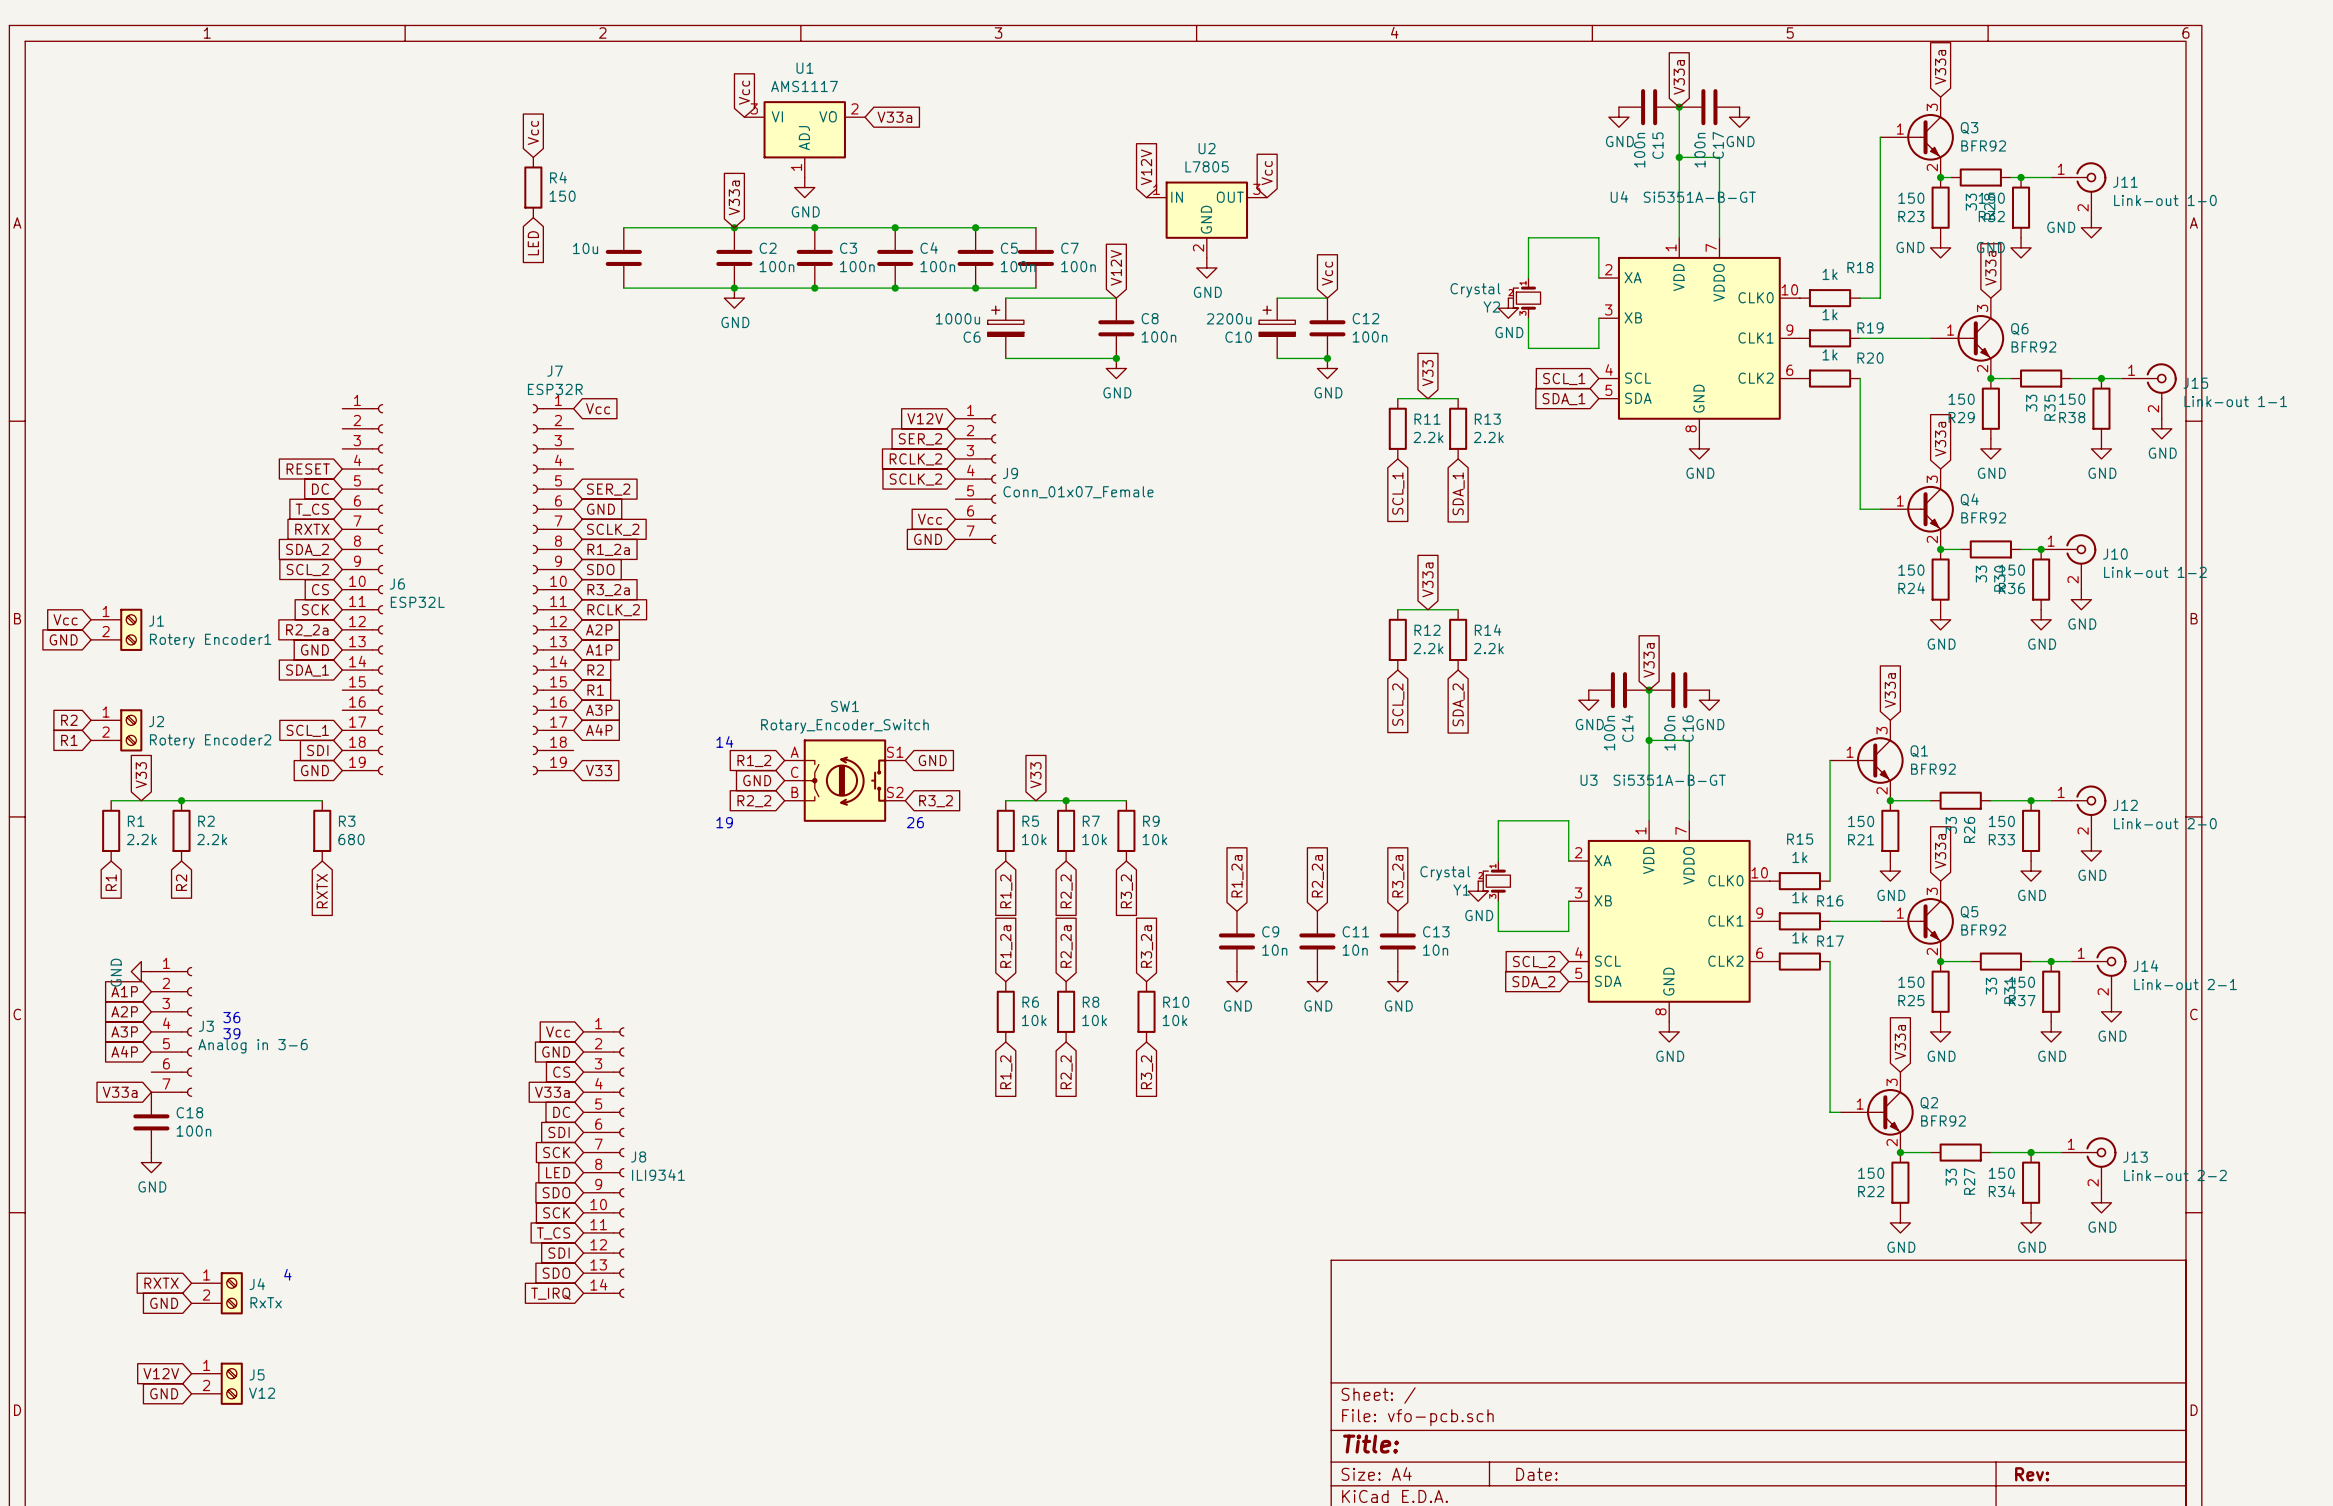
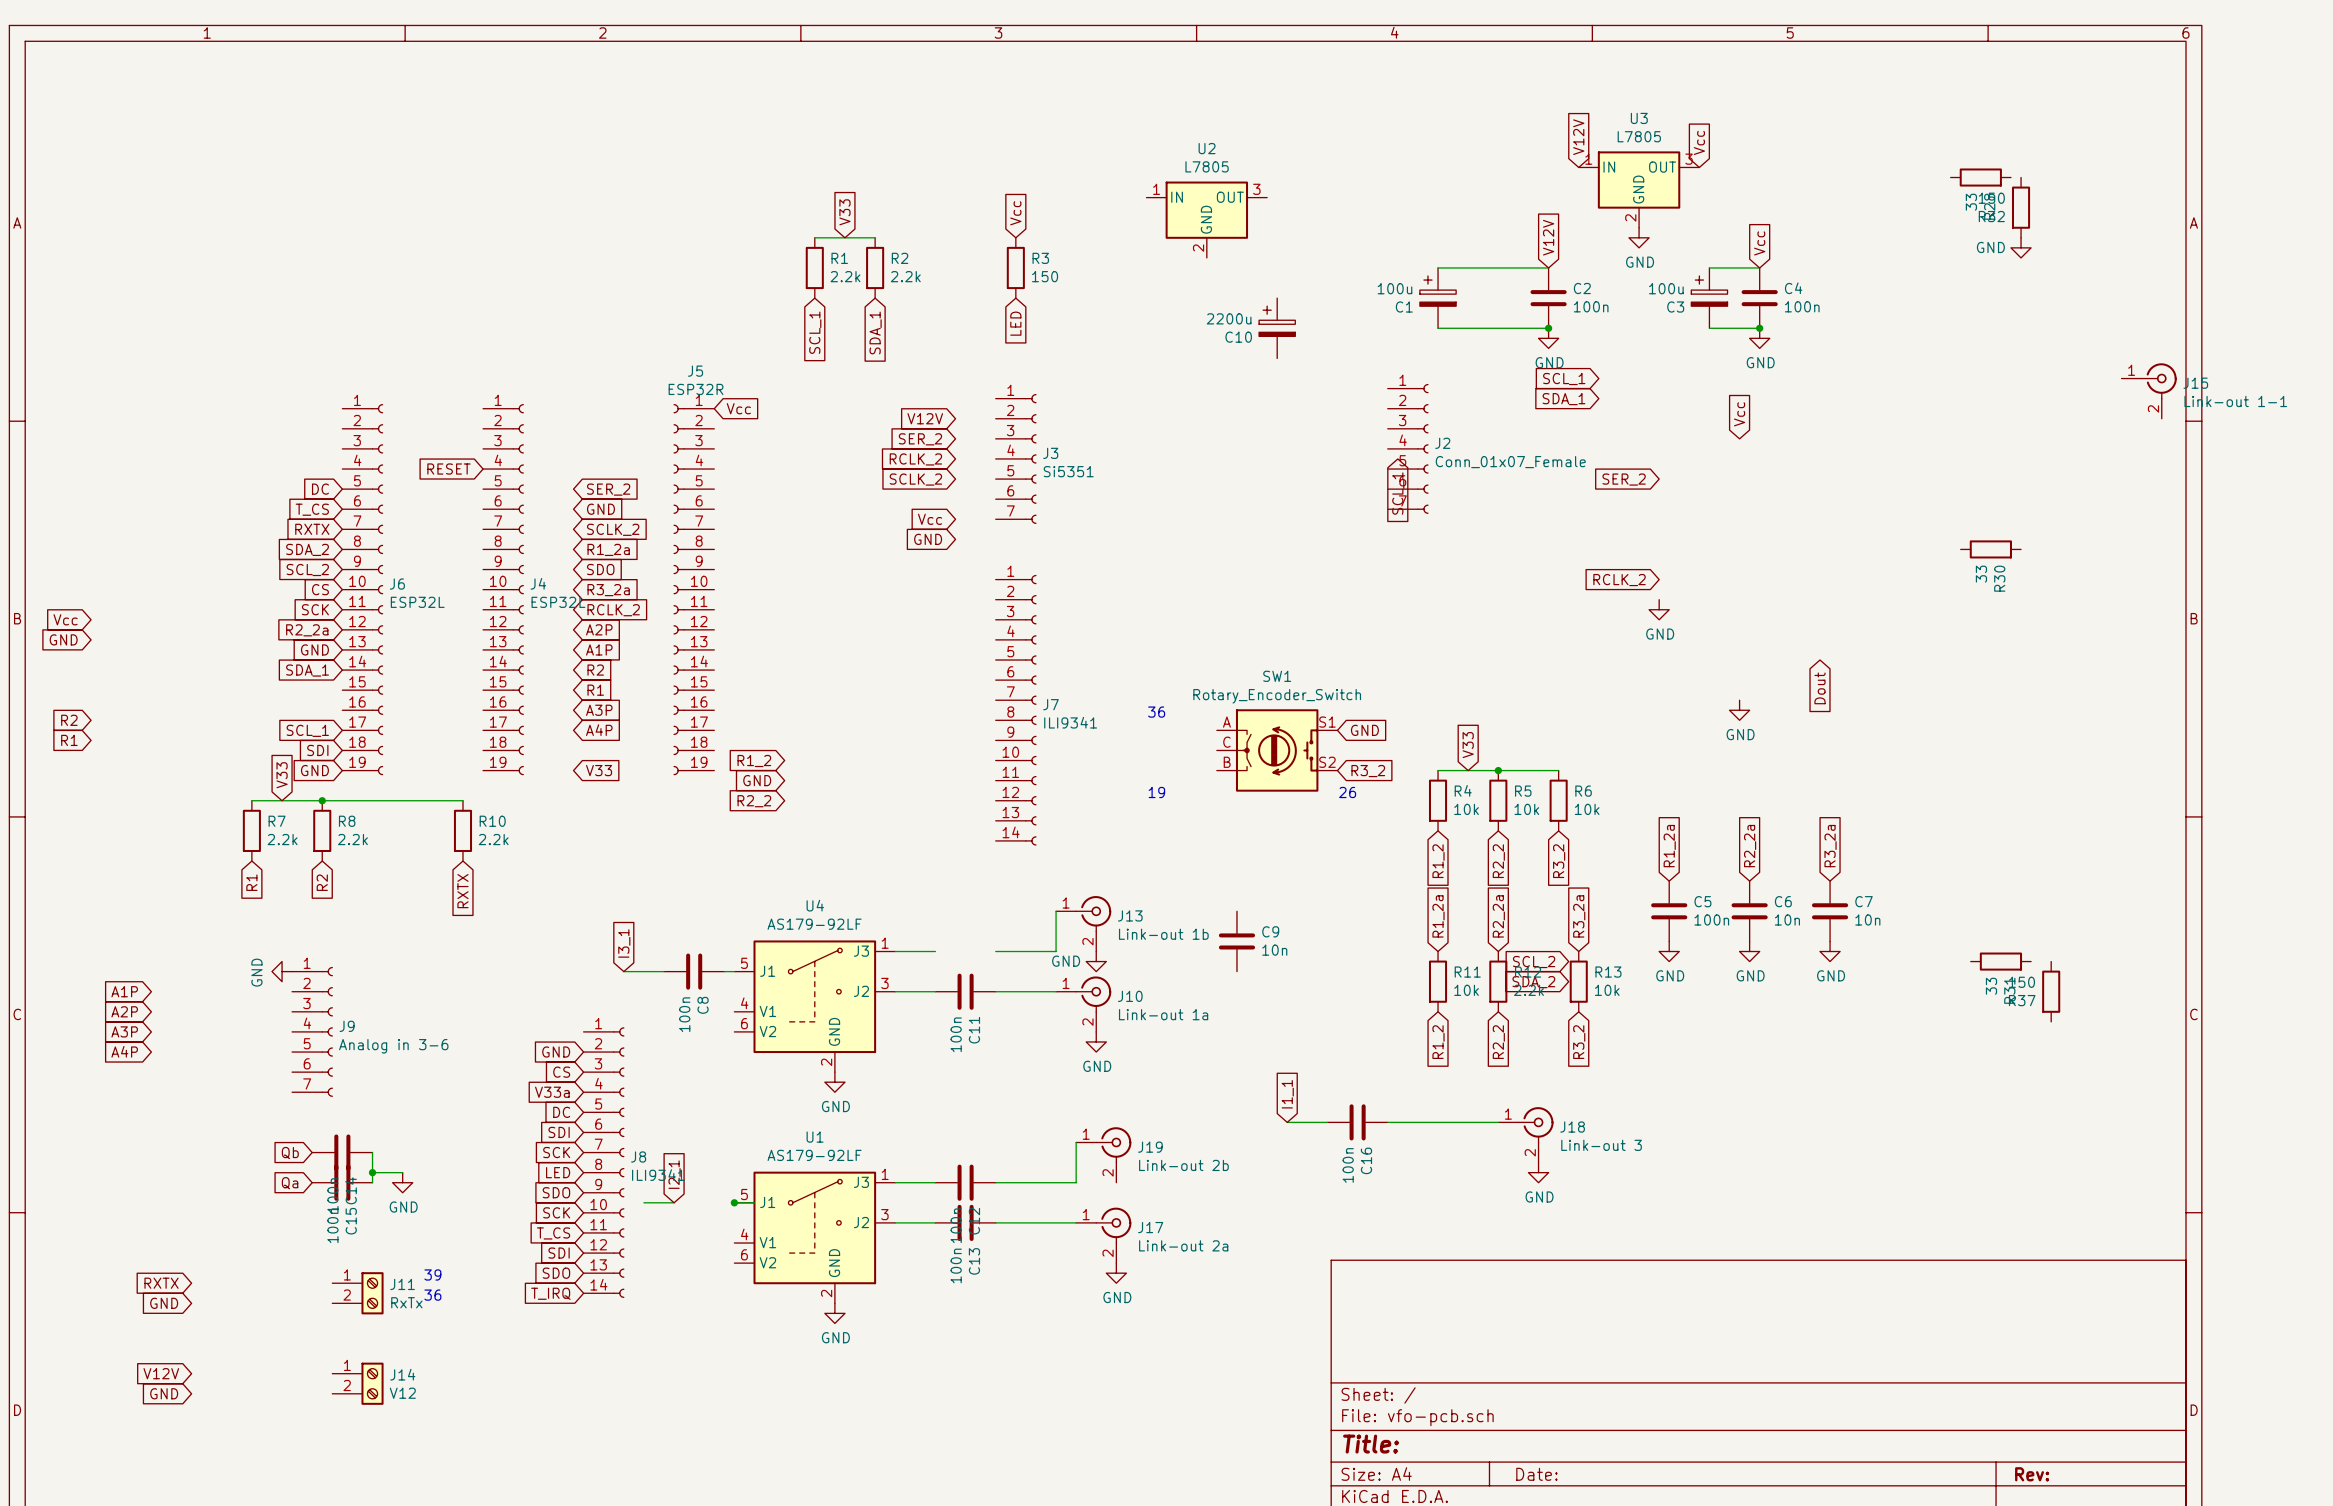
global label: V33a (1940, 67) -> none
U1 name position: U1 (804, 68) -> U1 (815, 1137)
global label: V33a (1679, 77) -> none
U1 value: AMS1117 (804, 86) -> AS179-92LF (814, 1155)
global label: Vcc (744, 92) -> none
U1 symbol: [744, 101, 866, 178] -> [734, 1171, 896, 1304]
C15 position: (1649, 107) -> (342, 1182)
wire: (1679, 107) (1679, 237) -> none
junction: (1679, 107) -> none
C17: 100n (1709, 107) -> none
global label: V33a (894, 117) -> none
power symbol: GND (1618, 117) -> none
power symbol: GND (1739, 117) -> none
global label: Vcc (533, 132) -> none
global label: none -> V12V (1578, 137)
wire: (1880, 137) (1880, 298) (1860, 298) -> none
Q3: BFR92 (1917, 137) -> none
global label: none -> Vcc (1699, 142)
wire: (1679, 157) (1719, 157) (1719, 237) -> none
junction: (1679, 157) -> none
J11 symbol: [2051, 162, 2107, 218] -> [332, 1272, 384, 1315]
global label: V12V (1146, 167) -> none
global label: Vcc (1267, 173) -> none
wire: (1940, 177) (1950, 177) -> none
junction: (1940, 177) -> none
wire: (2010, 177) (2051, 177) -> none
junction: (2021, 177) -> none
R4 position: (533, 187) -> (1438, 800)
power symbol: GND (804, 187) -> none
R4 value: 150 (562, 196) -> 10k (1466, 809)
global label: V33a (734, 197) -> none
U4 name position: U4 (1619, 197) -> U4 (815, 905)
U4 value: Si5351A-B-GT (1699, 197) -> AS179-92LF (814, 924)
J11 value: Link-out 1-0 (2165, 200) -> RxTx (406, 1302)
R23: 150 (1940, 207) -> none
global label: none -> V33 (844, 212)
global label: none -> Vcc (1015, 213)
wire: (623, 227) (1035, 227) -> none
junction: (734, 227) -> none
C3 symbol: [796, 227, 833, 289] -> [1691, 267, 1728, 329]
junction: (814, 227) -> none
junction: (895, 227) -> none
junction: (975, 227) -> none
power symbol: GND (2091, 227) -> none
wire: none -> (814, 237) (875, 237)
global label: none -> V12V (1548, 237)
U4 symbol: [1598, 237, 1800, 439] -> [734, 940, 896, 1073]
power symbol: none -> GND (1639, 237)
global label: LED (533, 243) -> none
global label: none -> Vcc (1759, 243)
power symbol: GND (1940, 247) -> none
C3 name position: C3 (848, 248) -> C3 (1675, 307)
part: 10u (623, 257) -> none
C2 position: (734, 257) -> (1548, 298)
C4 position: (895, 257) -> (1759, 298)
C5 position: (975, 257) -> (1669, 911)
C7 position: (1035, 257) -> (1830, 911)
C3 value: 100n (857, 266) -> 100u (1666, 288)
C7 value: 100n (1078, 266) -> 10n (1867, 919)
R3: none -> 150 (1015, 267)
global label: V12V (1116, 267) -> none
power symbol: GND (1206, 267) -> none
wire: none -> (1438, 267) (1548, 267)
global label: V33a (1990, 268) -> none
global label: Vcc (1327, 273) -> none
wire: (1528, 278) (1528, 237) (1598, 237) (1598, 278) -> none
wire: (623, 288) (1035, 288) -> none
junction: (734, 288) -> none
junction: (814, 288) -> none
junction: (895, 288) -> none
junction: (975, 288) -> none
power symbol: GND (734, 298) -> none
C6 symbol: [987, 298, 1024, 359] -> [1731, 881, 1768, 942]
wire: (1005, 298) (1116, 298) -> none
wire: (1277, 298) (1327, 298) -> none
C1: none -> 100u (1438, 298)
Y2: Crystal (1524, 298) -> none
R18: 1k (1830, 298) -> none
power symbol position: GND (1508, 308) -> GND (1548, 338)
C6 value: 1000u (957, 318) -> 10n (1787, 919)
wire: (1528, 318) (1528, 348) (1598, 348) (1598, 318) -> none
global label: none -> LED (1015, 323)
C8 rotation: 0° (1116, 328) -> 90° clockwise (694, 971)
C8 position: (1116, 328) -> (694, 971)
C12 rotation: 0° (1327, 328) -> 90° clockwise (965, 1182)
C12 position: (1327, 328) -> (965, 1182)
wire: none -> (1438, 328) (1548, 328)
junction: none -> (1548, 328)
junction: none -> (1759, 328)
global label: none -> SCL_1 (815, 332)
global label: none -> SDA_1 (875, 332)
C6 name position: C6 (972, 337) -> C6 (1783, 901)
power symbol: none -> GND (1759, 338)
R19: 1k (1830, 338) -> none
wire: (1860, 338) (1930, 338) -> none
Q6: BFR92 (1967, 338) -> none
wire: (1005, 358) (1116, 358) -> none
junction: (1116, 358) -> none
wire: (1277, 358) (1327, 358) -> none
junction: (1327, 358) -> none
power symbol: GND (1116, 368) -> none
power symbol: GND (1327, 368) -> none
J7 name position: J7 (555, 371) -> J7 (1050, 704)
global label: V33 (1427, 373) -> none
R20: 1k (1830, 378) -> none
wire: (1860, 378) (1860, 509) (1880, 509) -> none
wire: (1990, 378) (2010, 378) -> none
junction: (1990, 378) -> none
R35: 33 (2041, 378) -> none
wire: (2071, 378) (2121, 378) -> none
junction: (2101, 378) -> none
J7 value: ESP32R (555, 389) -> ILI9341 (1070, 722)
wire: (1397, 398) (1458, 398) -> none
J7 symbol: [532, 404, 574, 776] -> [995, 574, 1037, 846]
global label position: Vcc (598, 408) -> Vcc (738, 408)
R29: 150 (1990, 408) -> none
R38: 150 (2101, 408) -> none
global label: none -> Vcc (1739, 414)
R11 position: (1397, 428) -> (1438, 981)
R13 position: (1458, 428) -> (1578, 981)
power symbol: GND (2161, 428) -> none
R11 value: 2.2k (1428, 437) -> 10k (1466, 990)
R13 value: 2.2k (1488, 437) -> 10k (1607, 990)
global label: V33a (1940, 439) -> none
power symbol: GND (1699, 448) -> none
power symbol: GND (1990, 448) -> none
power symbol: GND (2101, 448) -> none
global label position: RESET (308, 469) -> RESET (448, 469)
J9 position: (975, 479) -> (312, 1031)
global label: none -> SER_2 (1624, 479)
J9 value: Conn_01x07_Female (1078, 492) -> Analog in 3-6 (393, 1046)
global label: SDA_1 (1458, 493) -> none
Q4: BFR92 (1917, 509) -> none
wire: (1940, 549) (1960, 549) -> none
junction: (1940, 549) -> none
wire: (2021, 549) (2041, 549) -> none
junction: (2041, 549) -> none
J10 position: (2068, 561) -> (1083, 1004)
J10 value: Link-out 1-2 (2155, 572) -> Link-out 1a (1163, 1014)
global label: V33a (1427, 579) -> none
R24: 150 (1940, 579) -> none
R36: 150 (2041, 579) -> none
global label: none -> RCLK_2 (1619, 580)
power symbol: GND (2081, 599) -> none
wire: (1397, 609) (1458, 609) -> none
power symbol: none -> GND (1659, 609)
power symbol: GND (1940, 619) -> none
power symbol: GND (2041, 619) -> none
J1: Rotery Encoder1 (116, 629) -> none
R12 position: (1397, 639) -> (1498, 981)
R14: 2.2k (1458, 639) -> none
global label: V33a (1649, 660) -> none
global label: none -> Dout (1819, 688)
C14 position: (1618, 690) -> (342, 1152)
wire: (1649, 690) (1649, 820) -> none
junction: (1649, 690) -> none
C16 position: (1679, 690) -> (1357, 1122)
global label: V33a (1890, 690) -> none
power symbol: GND (1588, 700) -> none
power symbol position: GND (1709, 700) -> GND (1739, 710)
global label: SCL_2 (1398, 704) -> none
global label: SDA_2 (1458, 704) -> none
J2 symbol: [91, 709, 143, 752] -> [1387, 383, 1429, 514]
text: none -> 36 (1156, 712)
global label: none -> GND (1364, 730)
wire: (1649, 740) (1689, 740) (1689, 820) -> none
junction: (1649, 740) -> none
J2 value: Rotery Encoder2 (210, 741) -> Conn_01x07_Female (1510, 462)
text: 14 (724, 741) -> none
global label: none -> V33 (1468, 745)
global label: GND (932, 760) -> none
wire: (1830, 760) (1830, 881) -> none
Q1: BFR92 (1866, 760) -> none
wire: none -> (1438, 770) (1558, 770)
junction: none -> (1498, 770)
global label: none -> R3_2 (1368, 771)
global label position: V33 (141, 775) -> V33 (282, 775)
global label: V33 (1035, 775) -> none
SW1 position: (844, 780) -> (1277, 750)
U3 name position: U3 (1589, 780) -> U3 (1639, 118)
U3 value: Si5351A-B-GT (1669, 780) -> L7805 (1639, 136)
text: none -> 19 (1156, 792)
text: none -> 26 (1347, 792)
wire: (111, 800) (251, 800) -> none
junction: (181, 800) -> none
wire: none -> (322, 800) (462, 800)
junction: none -> (322, 800)
wire: (1005, 800) (1126, 800) -> none
junction: (1066, 800) -> none
wire: (1890, 800) (1930, 800) -> none
junction: (1890, 800) -> none
R26: 33 (1960, 800) -> none
wire: (1990, 800) (2051, 800) -> none
junction: (2031, 800) -> none
global label: R3_2 (936, 801) -> none
J12: Link-out 2-0 (2078, 813) -> none
U3 symbol: [1568, 820, 1770, 1022] -> [1578, 151, 1700, 228]
R3 name: R3 (347, 821) -> R8 (347, 821)
text: 19 (724, 822) -> none
text: 26 (915, 822) -> none
R1 position: (111, 830) -> (814, 267)
R2 position: (181, 830) -> (875, 267)
R5 position: (1005, 830) -> (1498, 800)
R7 position: (1066, 830) -> (251, 830)
R9: 10k (1126, 830) -> none
R21: 150 (1890, 830) -> none
R33: 150 (2031, 830) -> none
R3 value: 680 (351, 839) -> 2.2k (352, 839)
R7 value: 10k (1094, 839) -> 2.2k (282, 839)
global label: none -> R1_2a (1669, 846)
global label: none -> R2_2a (1750, 846)
global label: none -> R3_2a (1830, 846)
power symbol: GND (2091, 850) -> none
global label: V33a (1940, 851) -> none
global label: none -> R1_2 (1438, 861)
wire: (1498, 861) (1498, 820) (1568, 820) (1568, 861) -> none
global label: none -> R2_2 (1498, 861)
global label: none -> R3_2 (1559, 861)
power symbol: GND (1890, 871) -> none
power symbol: GND (2031, 871) -> none
global label: R1_2a (1237, 876) -> none
global label position: R2_2a (1317, 876) -> R2_2a (1498, 916)
global label position: R3_2a (1398, 876) -> R3_2a (1579, 916)
Y1: Crystal (1494, 881) -> none
R15: 1k (1799, 881) -> none
global label position: R1 (111, 882) -> R1 (251, 882)
global label: R2 (181, 882) -> none
global label: RXTX (322, 891) -> R2 (322, 882)
global label: none -> RXTX (462, 891)
global label: R1_2 (1006, 891) -> none
global label: R2_2 (1066, 891) -> none
global label: R3_2 (1126, 891) -> none
power symbol: GND (1478, 891) -> none
wire: (1498, 901) (1498, 931) (1568, 931) (1568, 901) -> none
wire: none -> (1056, 911) (1056, 951) (995, 951)
global label: none -> R1_2a (1438, 916)
R16: 1k (1799, 921) -> none
wire: (1830, 921) (1880, 921) -> none
Q5: BFR92 (1917, 921) -> none
C11 rotation: 0° (1317, 941) -> 90° clockwise (965, 991)
C11 position: (1317, 941) -> (965, 991)
C13 rotation: 0° (1397, 941) -> 90° clockwise (965, 1222)
C13 position: (1397, 941) -> (965, 1222)
global label: none -> I3_1 (624, 943)
global label: R1_2a (1006, 946) -> none
global label: R2_2a (1066, 946) -> none
global label: R3_2a (1146, 946) -> none
J14 symbol: [2071, 946, 2127, 1002] -> [332, 1362, 384, 1405]
C11 value: 10n (1355, 950) -> 100n (956, 1034)
C13 value: 10n (1435, 950) -> 100n (956, 1265)
wire: none -> (895, 951) (935, 951)
power symbol: none -> GND (1669, 951)
power symbol: none -> GND (1749, 951)
power symbol: none -> GND (1830, 951)
power symbol: none -> GND (1096, 961)
R17: 1k (1799, 961) -> none
wire: (1830, 961) (1830, 1112) (1840, 1112) -> none
wire: (1940, 961) (1970, 961) -> none
junction: (1940, 961) -> none
wire: (2031, 961) (2071, 961) -> none
junction: (2051, 961) -> none
power symbol: GND (141, 971) -> none
power symbol: none -> GND (282, 971)
wire: none -> (623, 971) (664, 971)
wire: none -> (724, 971) (734, 971)
power symbol: GND (1236, 981) -> none
power symbol: GND (1317, 981) -> none
power symbol: GND (1397, 981) -> none
J14 value: Link-out 2-1 (2185, 984) -> V12 (402, 1393)
wire: none -> (895, 991) (935, 991)
wire: none -> (995, 991) (1056, 991)
R25: 150 (1940, 991) -> none
R6 position: (1005, 1011) -> (1558, 800)
R8: 10k (1066, 1011) -> none
R10 position: (1146, 1011) -> (462, 830)
power symbol: GND (2111, 1011) -> none
text: 36 (231, 1017) -> none
R10 value: 10k (1175, 1020) -> 2.2k (493, 839)
J3 position: (171, 1031) -> (1016, 458)
global label: Vcc (558, 1031) -> none
power symbol: GND (1669, 1031) -> none
power symbol: GND (1940, 1031) -> none
power symbol: GND (2051, 1031) -> none
text: 39 (231, 1033) -> none
power symbol: none -> GND (1096, 1041)
global label: none -> R1_2 (1438, 1042)
global label: none -> R2_2 (1498, 1042)
global label: none -> R3_2 (1579, 1042)
global label: V33a (1900, 1042) -> none
J3 value: Analog in 3-6 (253, 1046) -> Si5351 (1068, 471)
global label: R1_2 (1006, 1072) -> none
global label: R2_2 (1066, 1072) -> none
global label: R3_2 (1146, 1072) -> none
power symbol: none -> GND (834, 1082)
global label: V33a (120, 1092) -> none
global label: none -> I1_1 (1287, 1094)
Q2: BFR92 (1876, 1112) -> none
C18: 100n (151, 1122) -> none
wire: none -> (1287, 1122) (1327, 1122)
wire: none -> (1387, 1122) (1498, 1122)
J18: none -> Link-out 3 (1525, 1134)
wire: none -> (1076, 1142) (1076, 1182) (995, 1182)
wire: none -> (372, 1152) (372, 1182)
wire: (1900, 1152) (1930, 1152) -> none
junction: (1900, 1152) -> none
R27: 33 (1960, 1152) -> none
wire: (1990, 1152) (2061, 1152) -> none
junction: (2031, 1152) -> none
global label: none -> Qb (290, 1153)
J19: none -> Link-out 2b (1103, 1154)
power symbol: GND (151, 1162) -> none
J13 position: (2088, 1165) -> (1083, 923)
wire: none -> (372, 1172) (402, 1172)
junction: none -> (372, 1172)
power symbol: none -> GND (1538, 1172)
global label: none -> I2_1 (674, 1174)
J13 value: Link-out 2-2 (2175, 1175) -> Link-out 1b (1163, 934)
power symbol: none -> GND (402, 1182)
wire: none -> (895, 1182) (935, 1182)
R22: 150 (1900, 1182) -> none
R34: 150 (2031, 1182) -> none
global label: none -> Qa (290, 1183)
wire: none -> (643, 1202) (674, 1202)
wire: none -> (734, 1202) (754, 1202)
junction: none -> (734, 1202)
power symbol: GND (2101, 1202) -> none
wire: none -> (895, 1222) (935, 1222)
wire: none -> (995, 1222) (1076, 1222)
power symbol: GND (1900, 1222) -> none
power symbol: GND (2031, 1222) -> none
J17: none -> Link-out 2a (1103, 1235)
J4 symbol: [191, 1272, 243, 1315] -> [483, 404, 524, 776]
power symbol: none -> GND (1116, 1273)
text: 4 (287, 1274) -> none
text: none -> 39 (432, 1274)
text: none -> 36 (432, 1295)
J4 value: RxTx (266, 1302) -> ESP32L (558, 602)
power symbol: none -> GND (834, 1313)
J5 symbol: [191, 1362, 243, 1405] -> [673, 404, 715, 776]
J5 name position: J5 (257, 1374) -> J5 (695, 371)
J5 value: V12 (262, 1393) -> ESP32R (696, 389)

